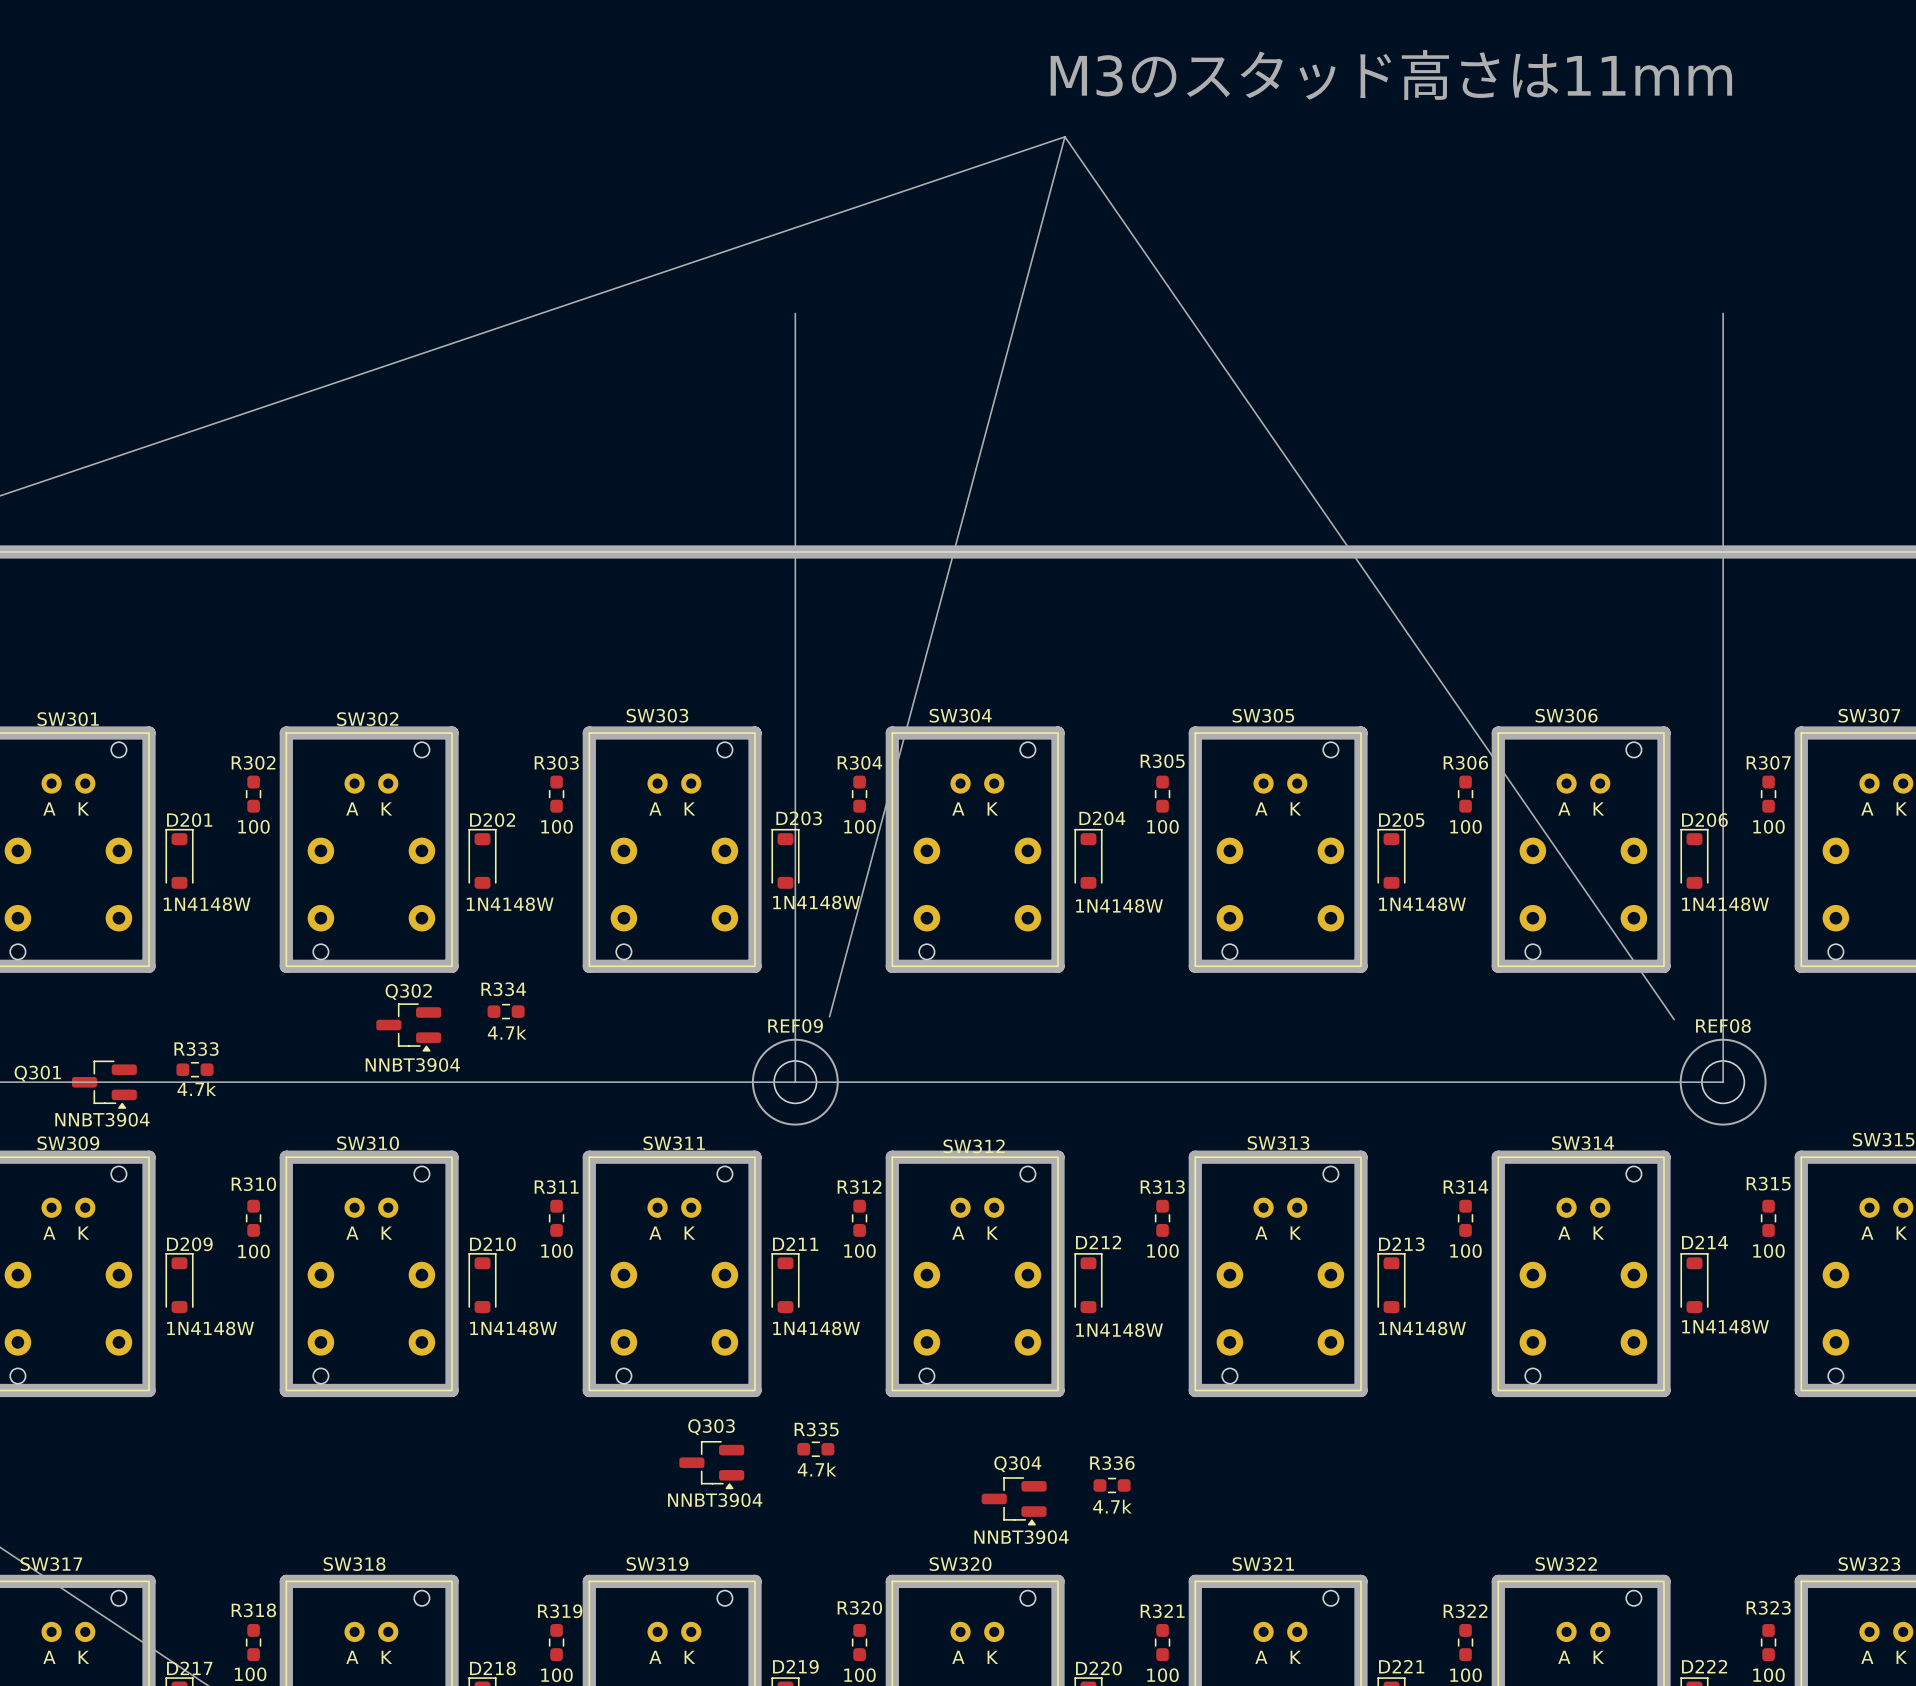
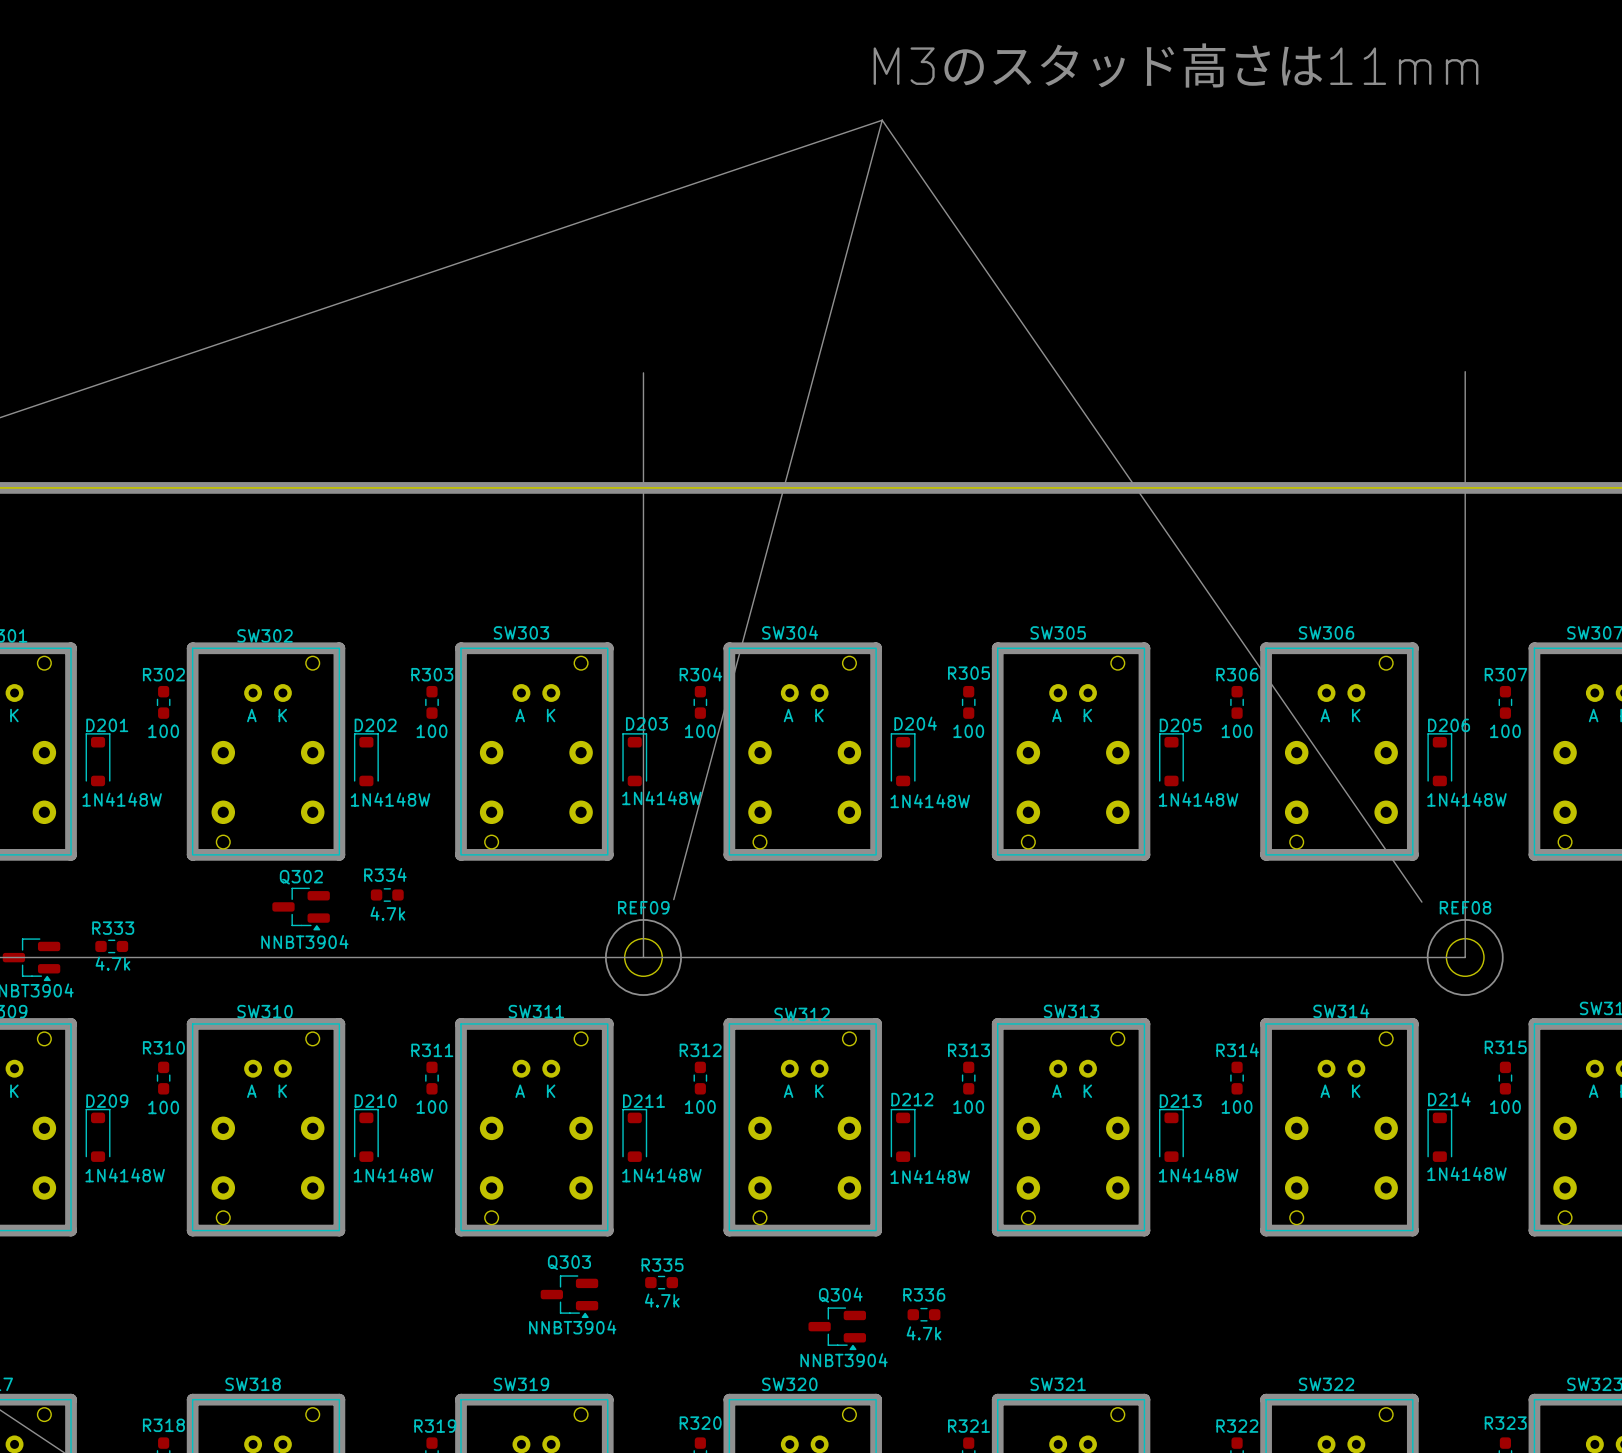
line: (795, 313) (795, 422) -> none
line: (1723, 313) (1723, 420) -> none

